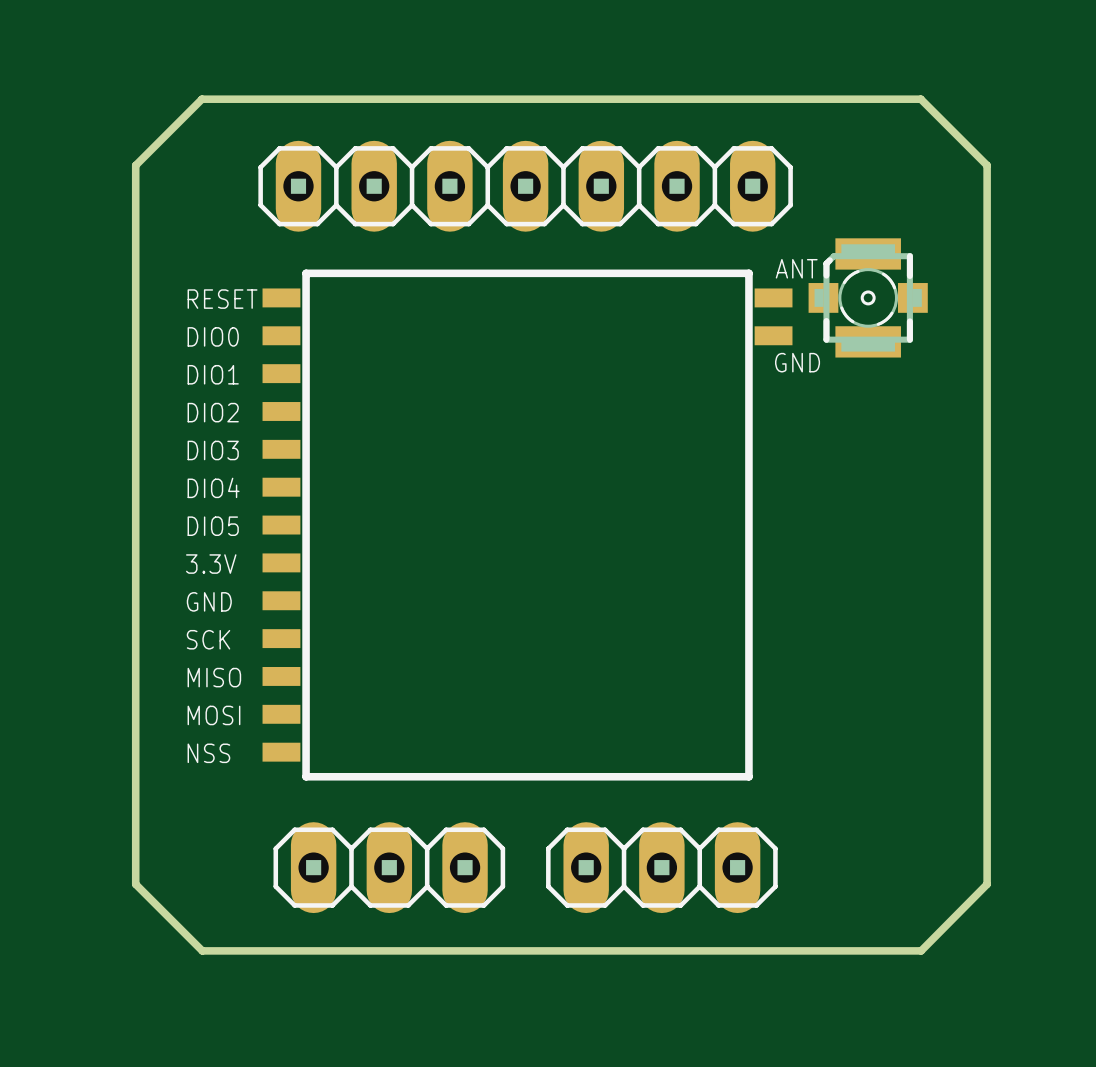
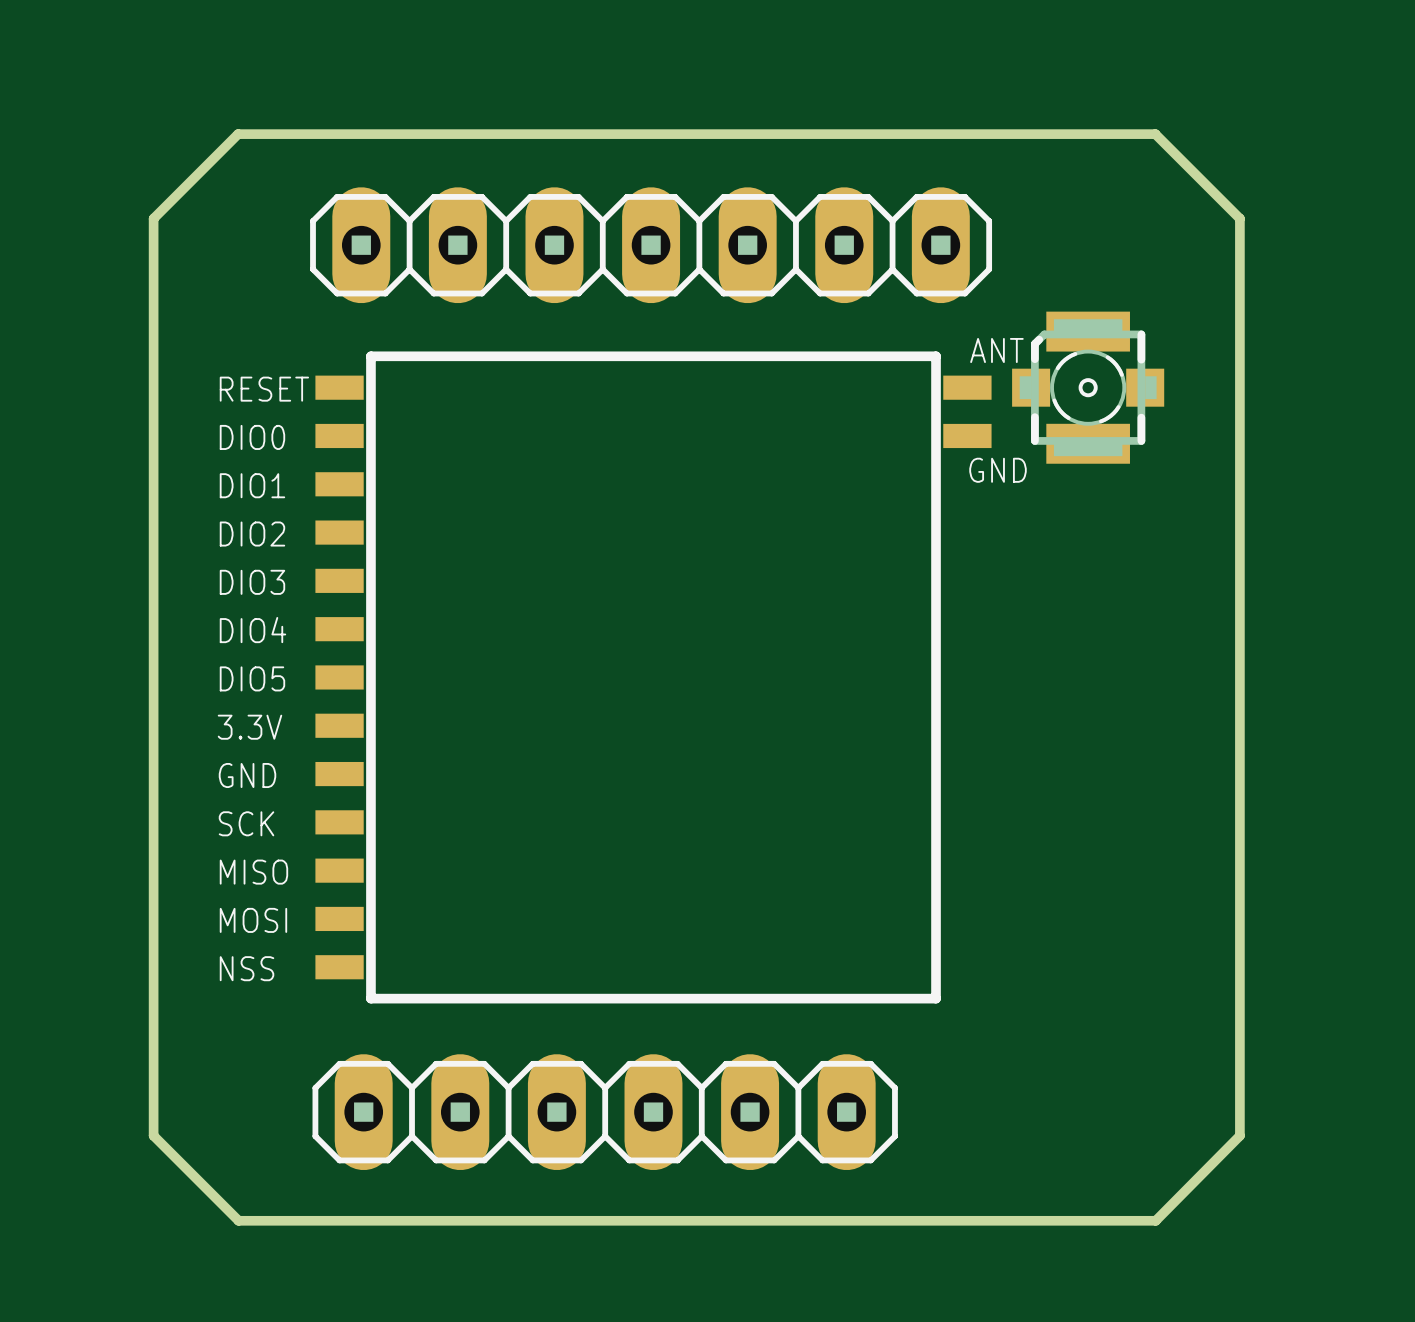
part: none -> (605, 1112)
part: (389, 867) -> none
part: (661, 867) -> none

